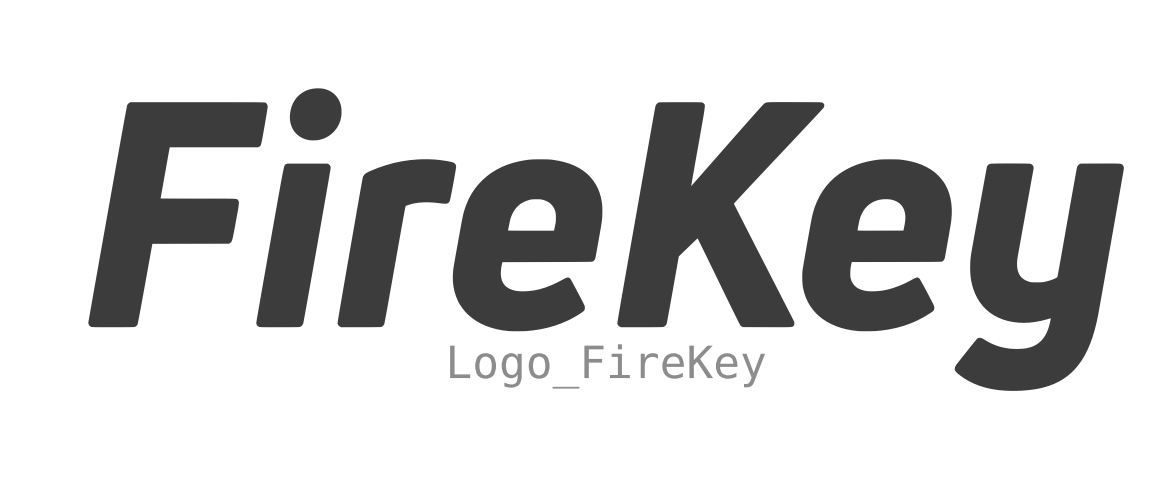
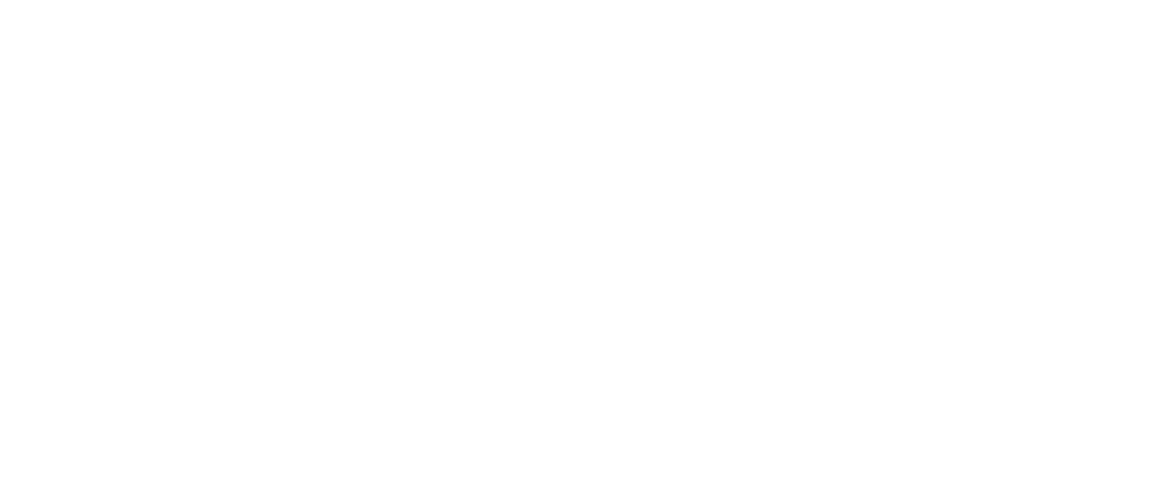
drawing: [88, 88, 1124, 391] -> none

